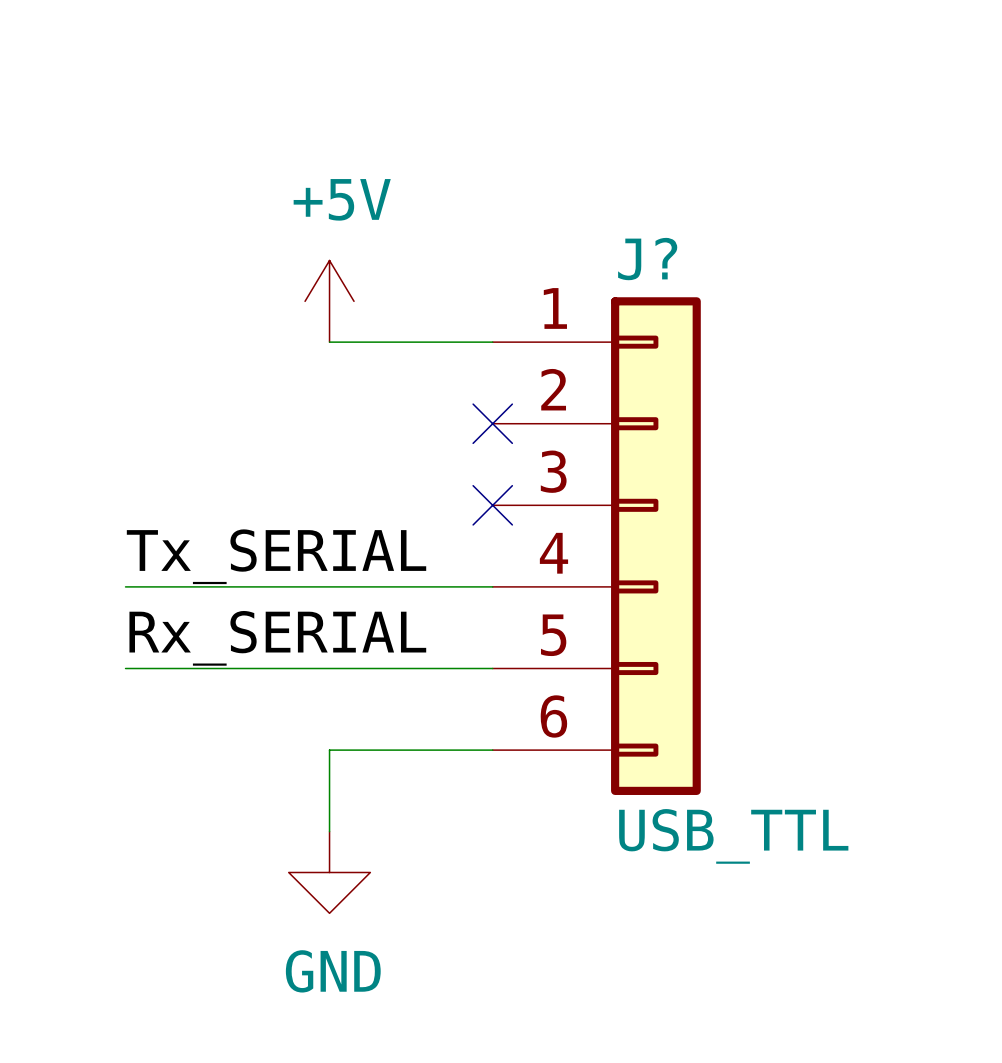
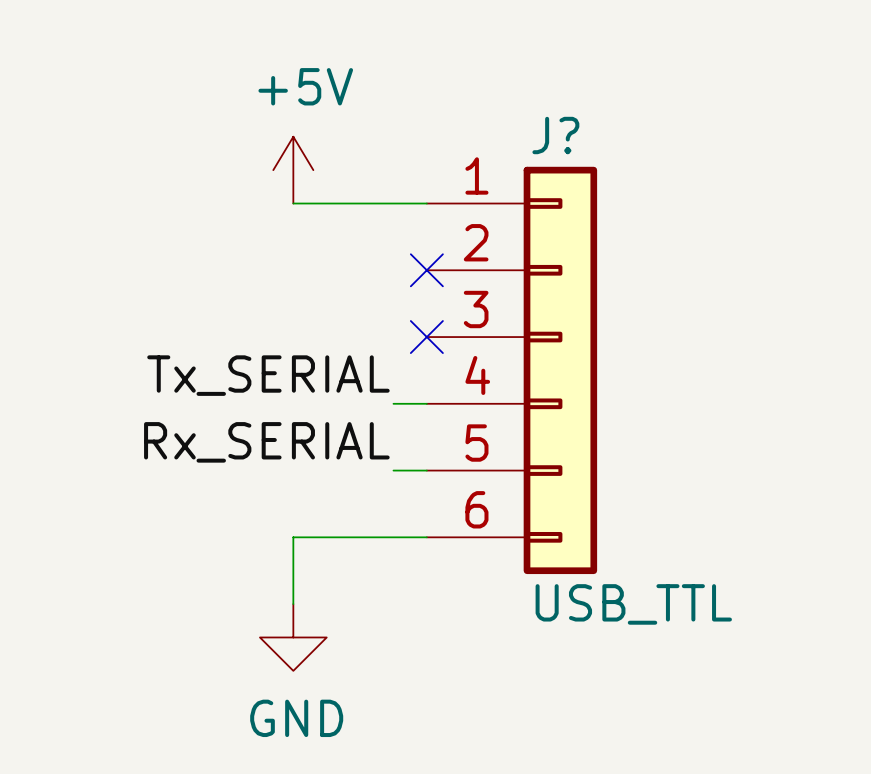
label position: Tx_SERIAL (276, 556) -> Tx_SERIAL (268, 375)
wire: (125, 586) (451, 586) -> none
label position: Rx_SERIAL (277, 638) -> Rx_SERIAL (266, 442)
wire: (125, 668) (451, 668) -> none

